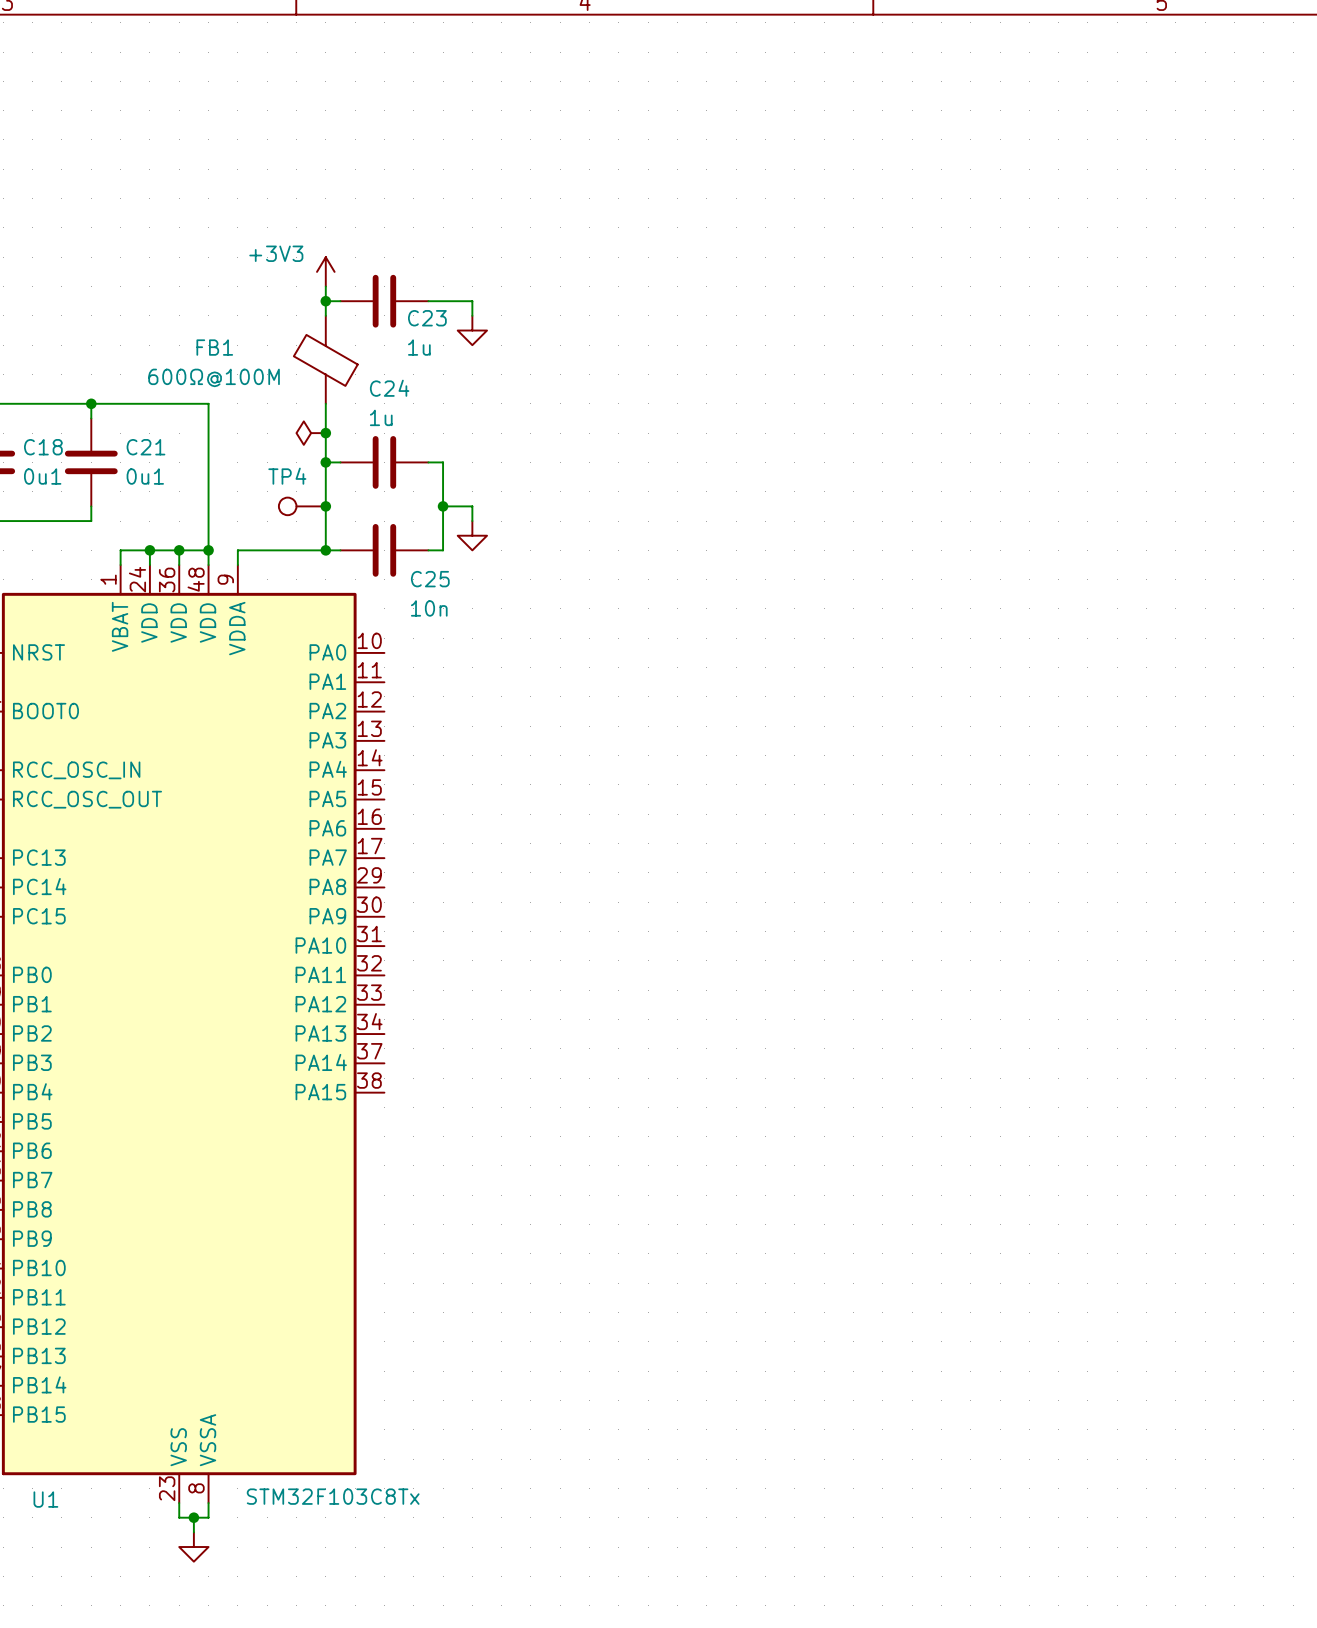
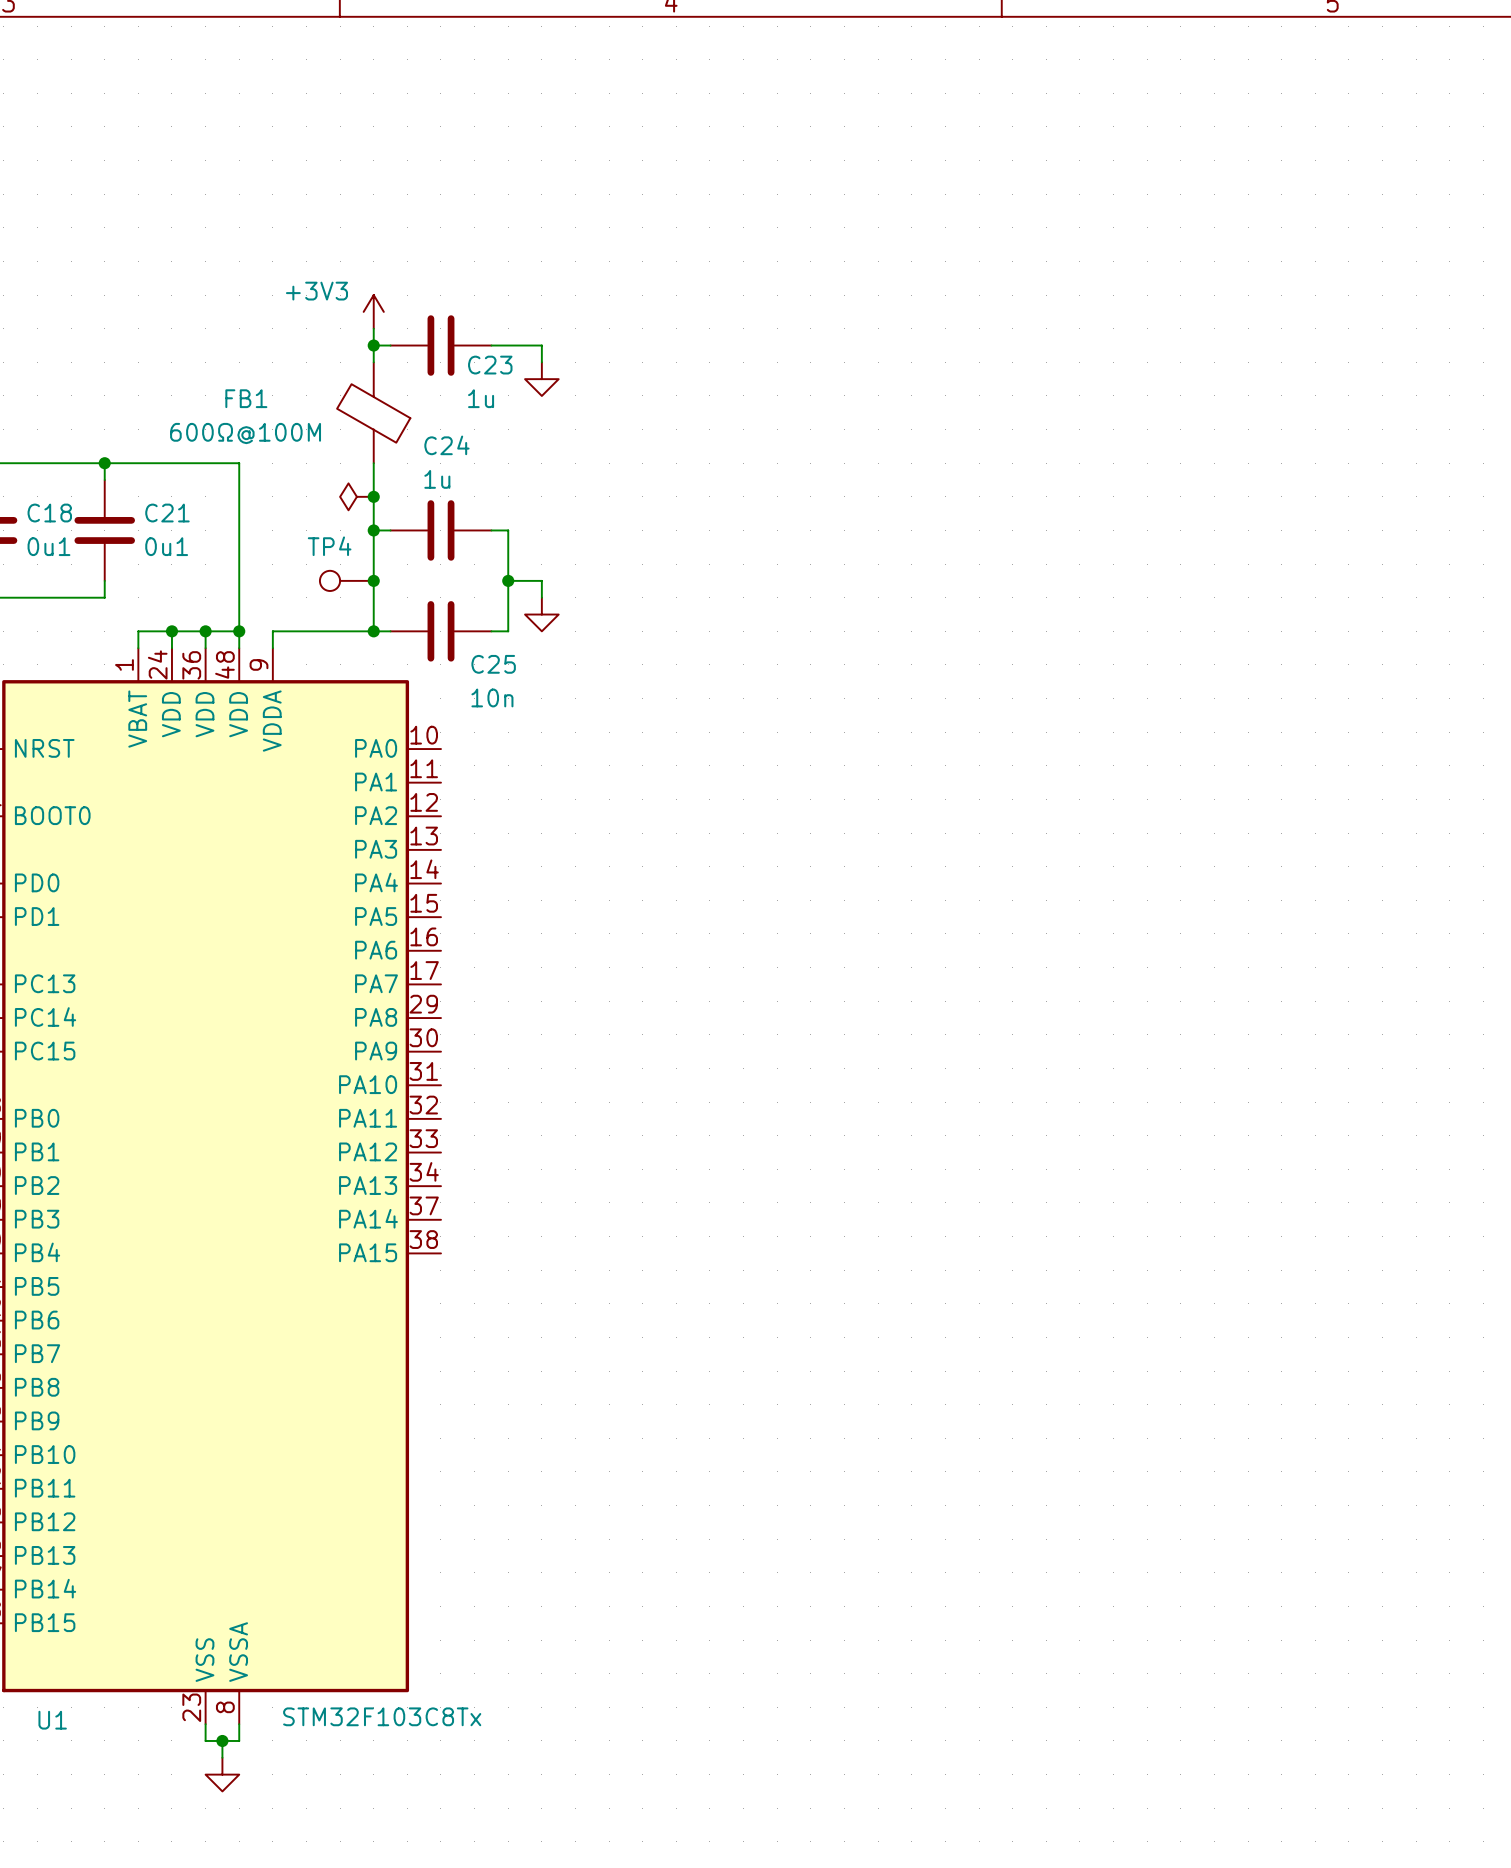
U1 pin name: RCC_OSC_IN (76, 770) -> PD0 (37, 882)
U1 pin name: RCC_OSC_OUT (87, 799) -> PD1 (37, 916)

